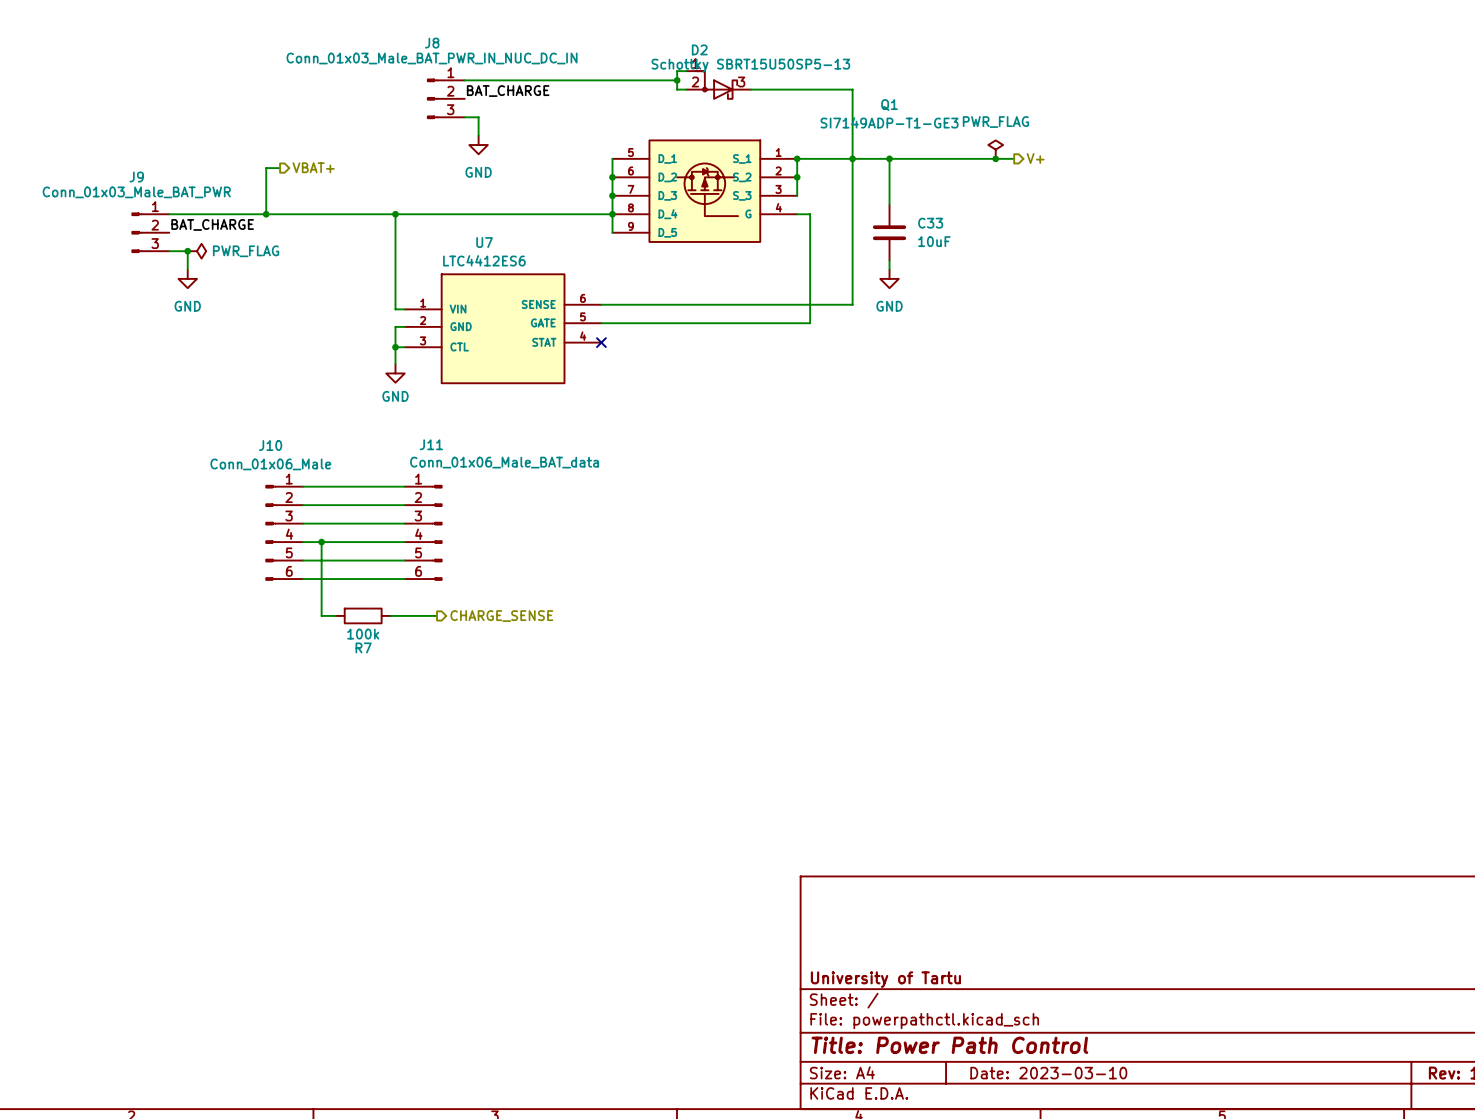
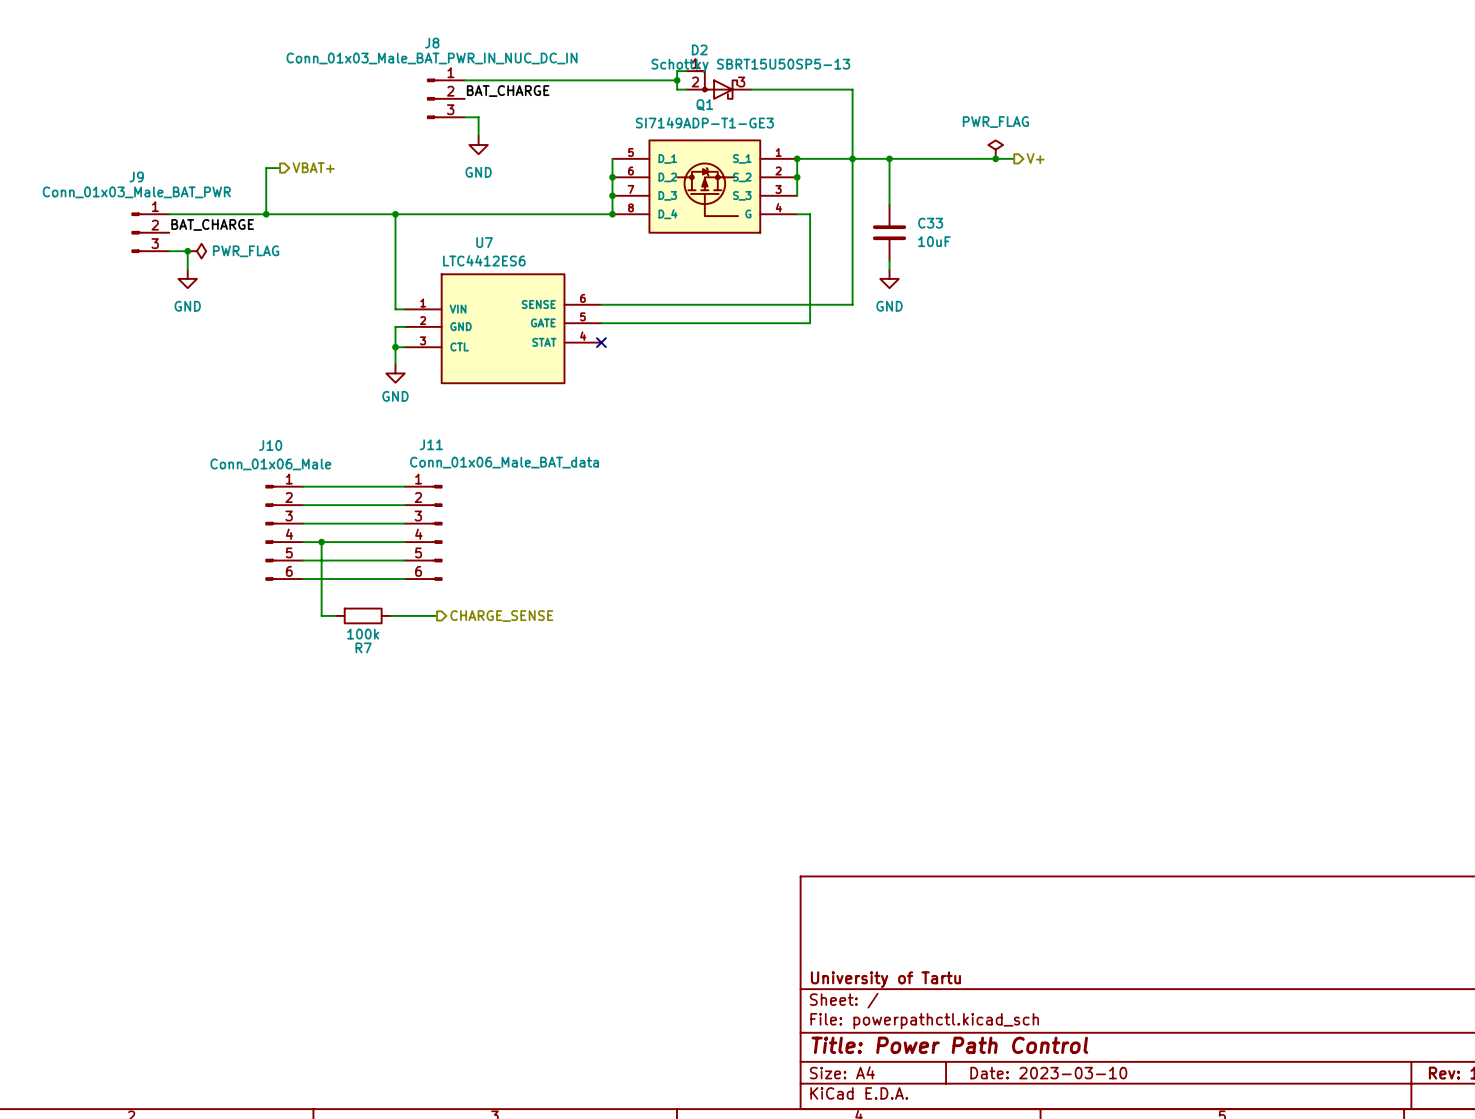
Q1 name position: Q1 (889, 105) -> Q1 (704, 105)
Q1 value position: SI7149ADP-T1-GE3 (889, 122) -> SI7149ADP-T1-GE3 (704, 122)
Q1 symbol: [612, 139, 798, 243] -> [612, 139, 798, 234]
wire: (612, 214) (612, 232) -> none

